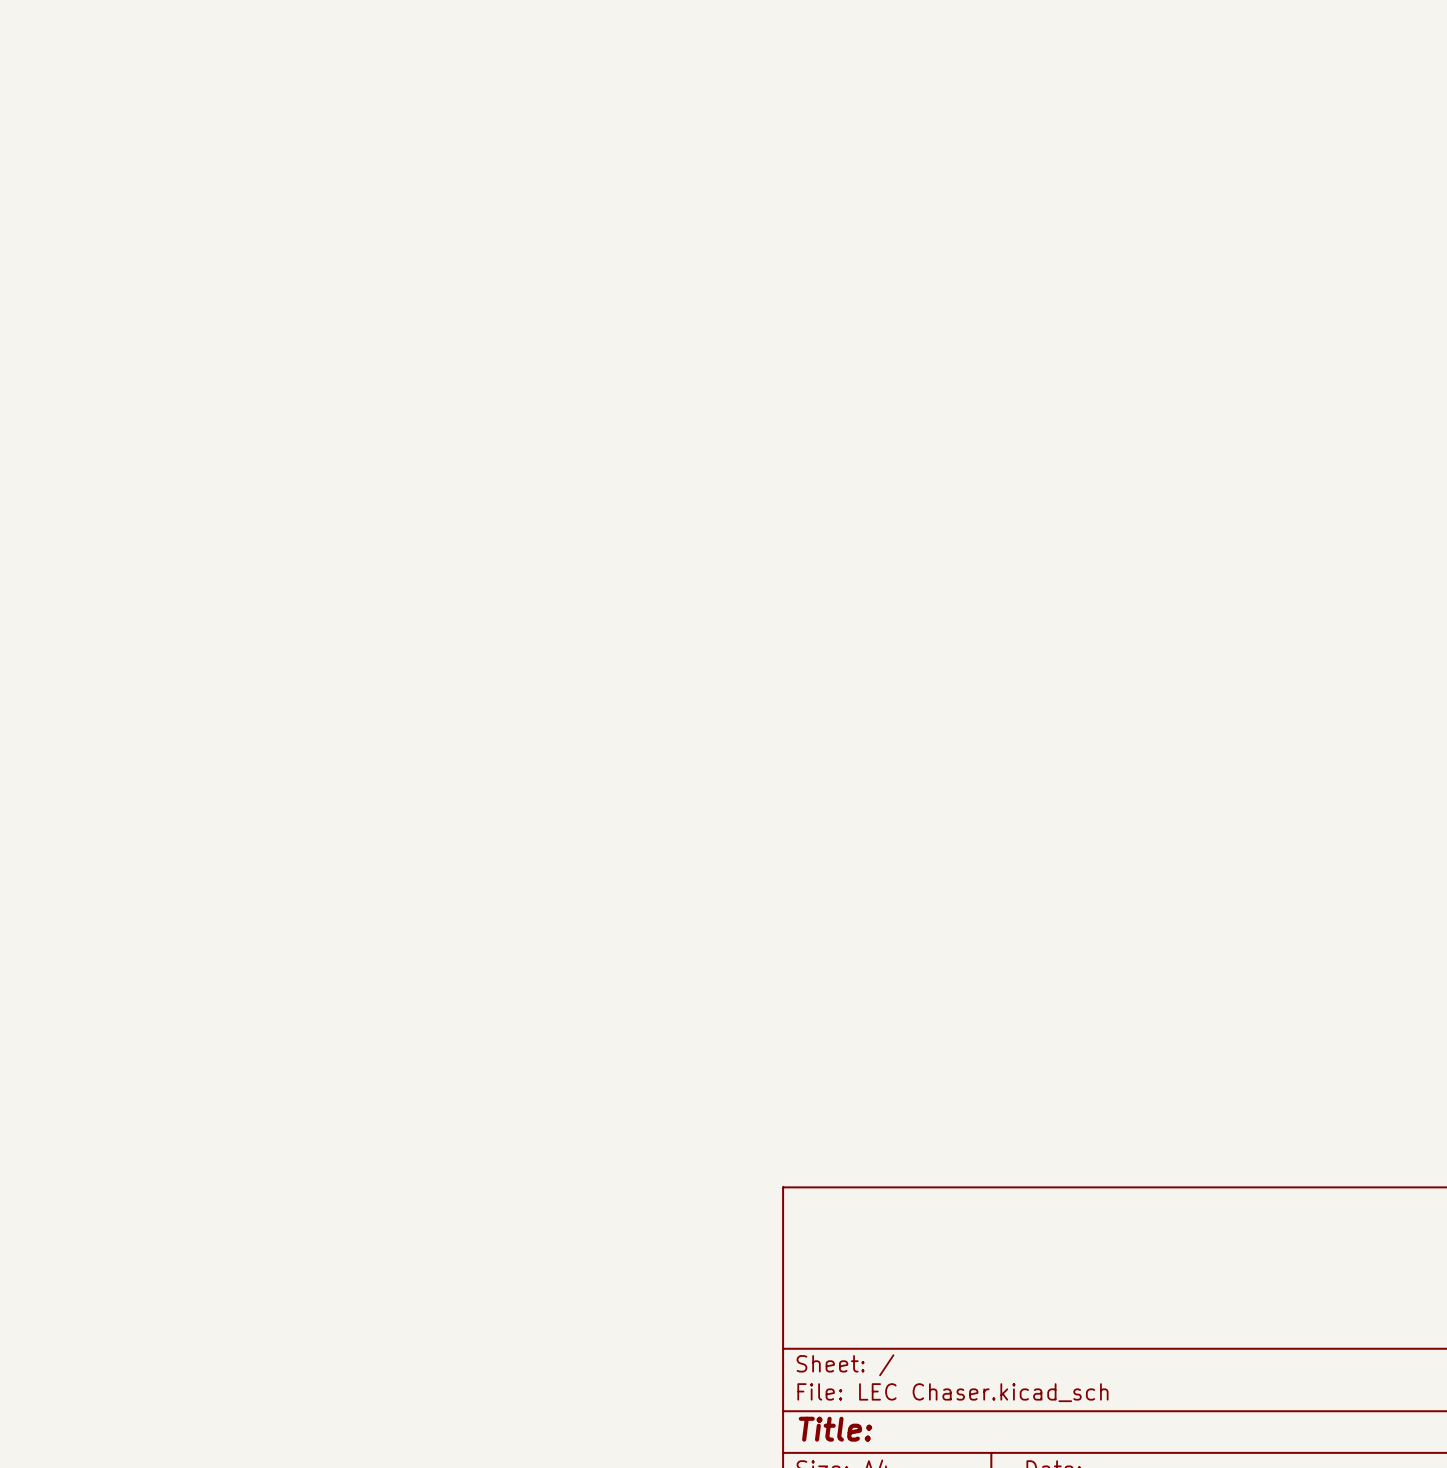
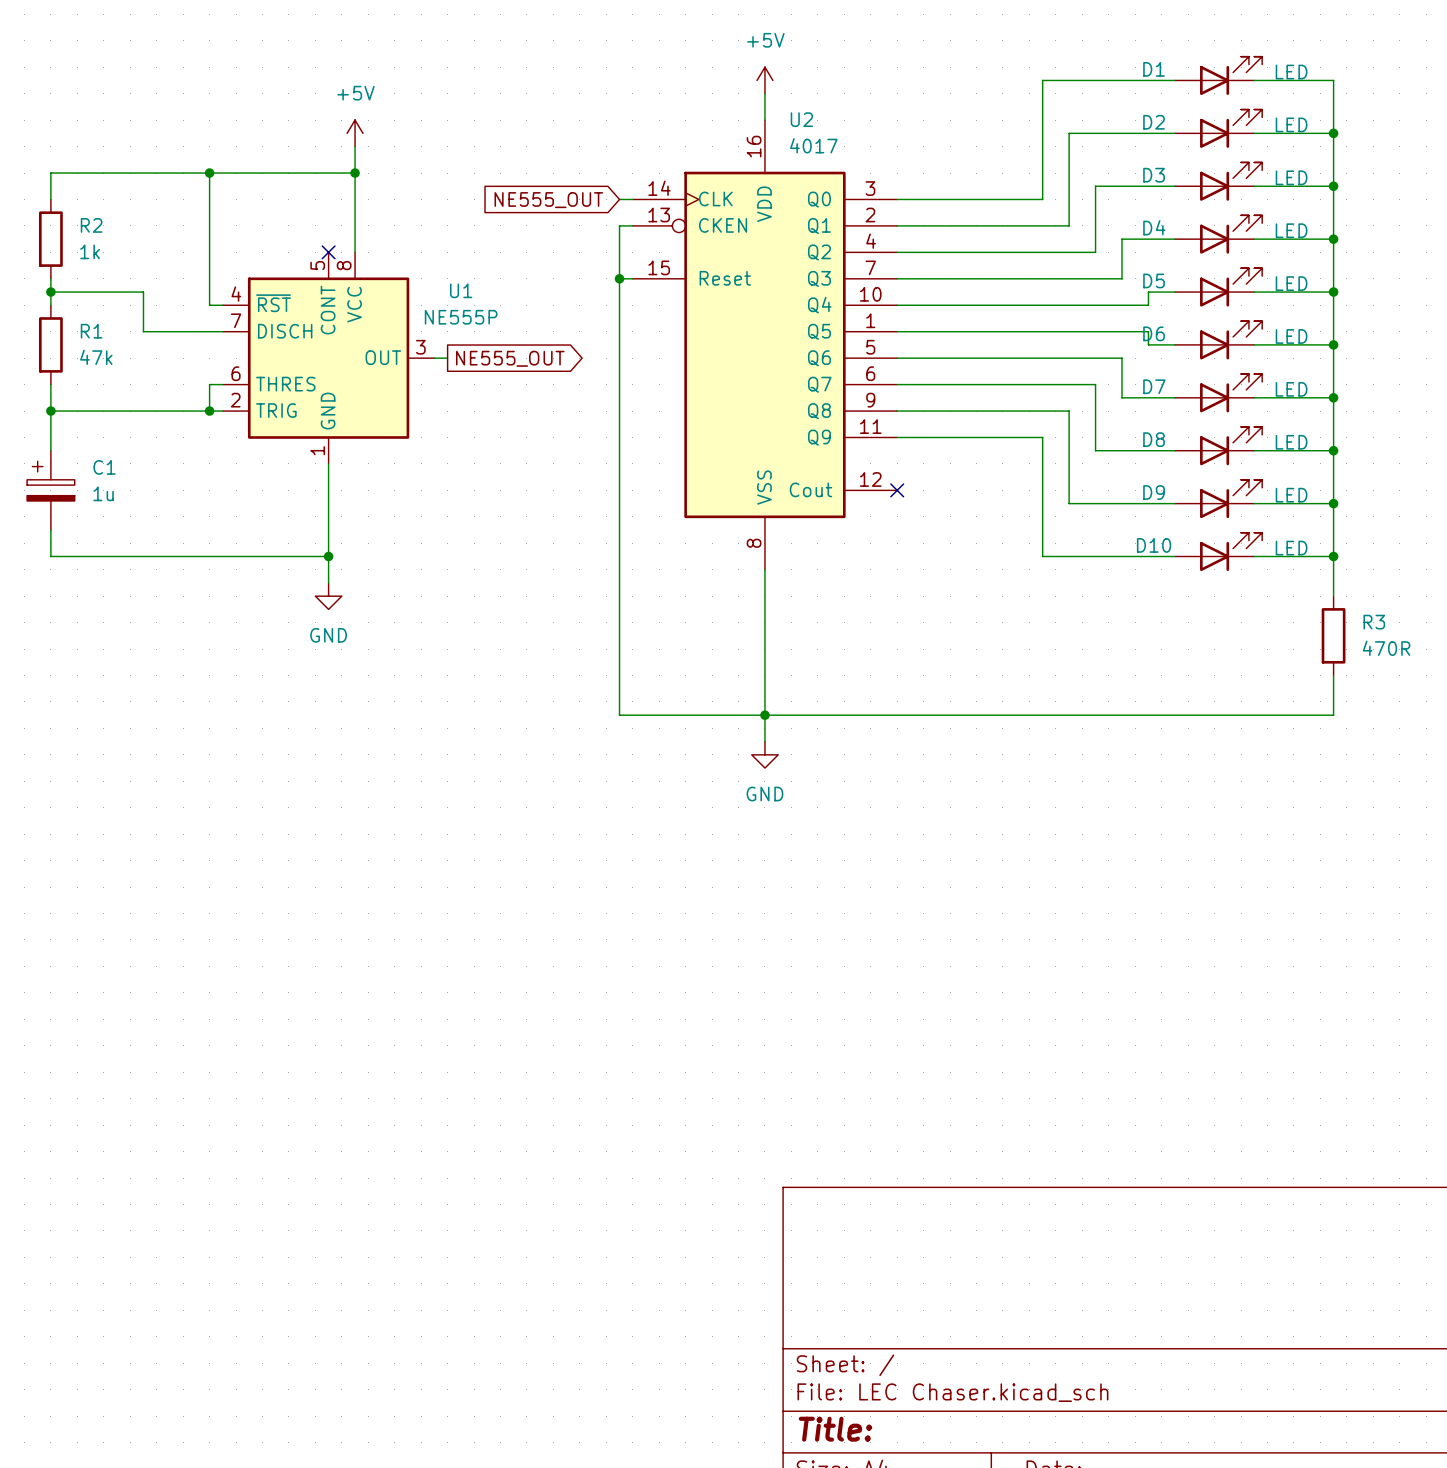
D1: none -> LED (1218, 75)
power symbol: none -> +5V (764, 80)
wire: none -> (1174, 80) (1042, 80) (1042, 199) (897, 199)
wire: none -> (1254, 80) (1333, 80) (1333, 596)
wire: none -> (764, 93) (764, 120)
D2: none -> LED (1218, 128)
power symbol: none -> +5V (355, 133)
wire: none -> (1174, 133) (1069, 133) (1069, 225) (897, 225)
wire: none -> (1254, 133) (1333, 133)
junction: none -> (1333, 133)
wire: none -> (355, 146) (355, 252)
wire: none -> (209, 173) (209, 305) (222, 305)
junction: none -> (209, 173)
wire: none -> (355, 173) (50, 173) (50, 199)
junction: none -> (355, 173)
D3: none -> LED (1218, 181)
wire: none -> (1174, 186) (1095, 186) (1095, 252) (897, 252)
wire: none -> (1254, 186) (1333, 186)
junction: none -> (1333, 186)
wire: none -> (619, 199) (632, 199)
global label: none -> NE555_OUT (548, 200)
wire: none -> (632, 225) (619, 225) (619, 715) (1333, 715) (1333, 675)
D4: none -> LED (1218, 234)
R2: none -> 1k (50, 239)
wire: none -> (1174, 239) (1122, 239) (1122, 278) (897, 278)
wire: none -> (1254, 239) (1333, 239)
junction: none -> (1333, 239)
no-connect mark: none -> (328, 252)
wire: none -> (50, 278) (50, 305)
wire: none -> (619, 278) (632, 278)
junction: none -> (619, 278)
D5: none -> LED (1218, 287)
wire: none -> (50, 292) (143, 292) (143, 331) (222, 331)
junction: none -> (50, 292)
wire: none -> (1174, 292) (1148, 292) (1148, 305) (897, 305)
wire: none -> (1254, 292) (1333, 292)
junction: none -> (1333, 292)
wire: none -> (897, 331) (1148, 331) (1148, 344) (1174, 344)
D6: none -> LED (1218, 340)
R1: none -> 47k (50, 344)
U2: none -> 4017 (764, 344)
wire: none -> (1254, 344) (1333, 344)
junction: none -> (1333, 344)
U1: none -> NE555P (328, 358)
wire: none -> (434, 358) (447, 358)
global label: none -> NE555_OUT (510, 358)
wire: none -> (897, 358) (1122, 358) (1122, 397) (1174, 397)
wire: none -> (50, 384) (50, 450)
wire: none -> (222, 384) (209, 384) (209, 411)
wire: none -> (897, 384) (1095, 384) (1095, 450) (1174, 450)
D7: none -> LED (1218, 393)
wire: none -> (1254, 397) (1333, 397)
junction: none -> (1333, 397)
wire: none -> (50, 411) (222, 411)
junction: none -> (50, 411)
junction: none -> (209, 411)
wire: none -> (897, 411) (1069, 411) (1069, 503) (1174, 503)
wire: none -> (897, 437) (1042, 437) (1042, 556) (1174, 556)
D8: none -> LED (1218, 446)
wire: none -> (1254, 450) (1333, 450)
junction: none -> (1333, 450)
wire: none -> (328, 463) (328, 582)
C1: none -> 1u (50, 490)
no-connect mark: none -> (897, 490)
D9: none -> LED (1218, 498)
wire: none -> (1254, 503) (1333, 503)
junction: none -> (1333, 503)
wire: none -> (50, 530) (50, 556) (328, 556)
D10: none -> LED (1218, 551)
junction: none -> (328, 556)
wire: none -> (1254, 556) (1333, 556)
junction: none -> (1333, 556)
wire: none -> (764, 569) (764, 741)
power symbol: none -> GND (328, 596)
R3: none -> 470R (1333, 635)
junction: none -> (764, 715)
power symbol: none -> GND (764, 754)

